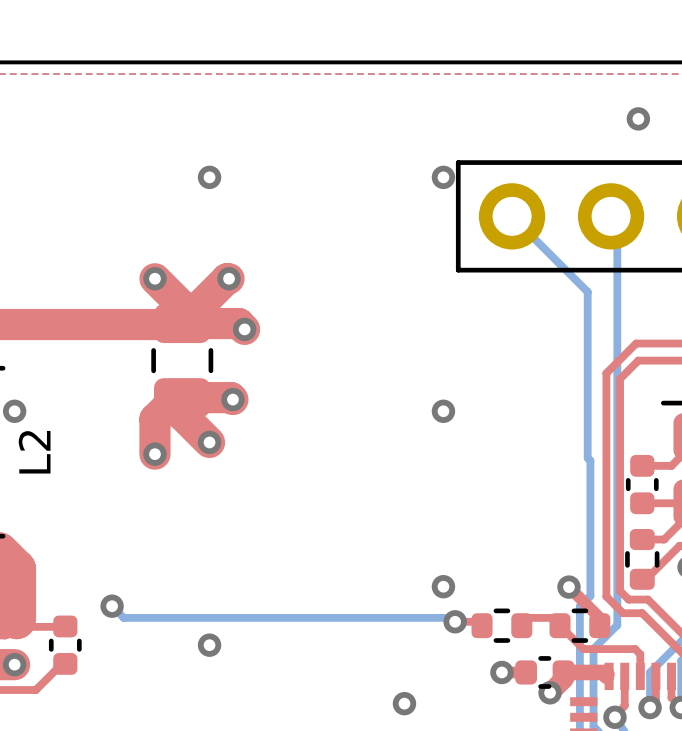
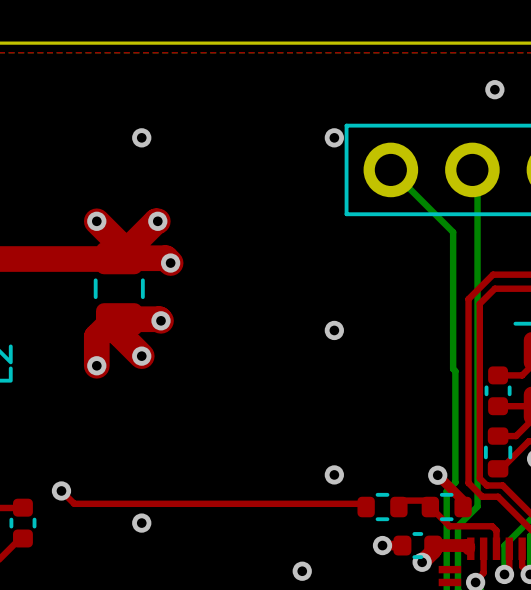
top track: none -> (61, 490) (74, 503) (343, 503)
bottom track: (112, 606) (123, 617) (451, 617) (455, 621) -> none
via: (455, 621) -> none

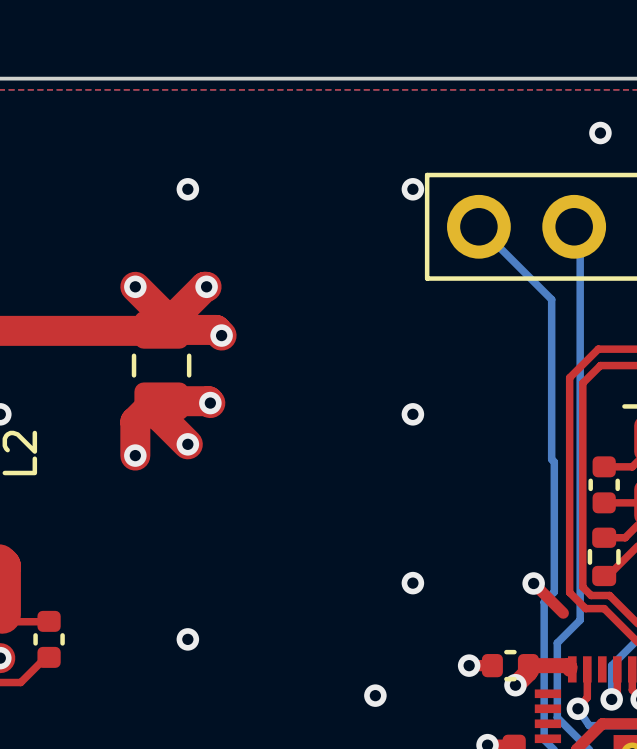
top track: (61, 490) (74, 503) (362, 503) (366, 507) -> none
via: (61, 490) -> none
top track: (398, 500) (430, 500) -> none
part: (382, 507) -> none
top track: (430, 507) (449, 526) (492, 526) (496, 530) (496, 548) -> none
part: (446, 507) -> none

